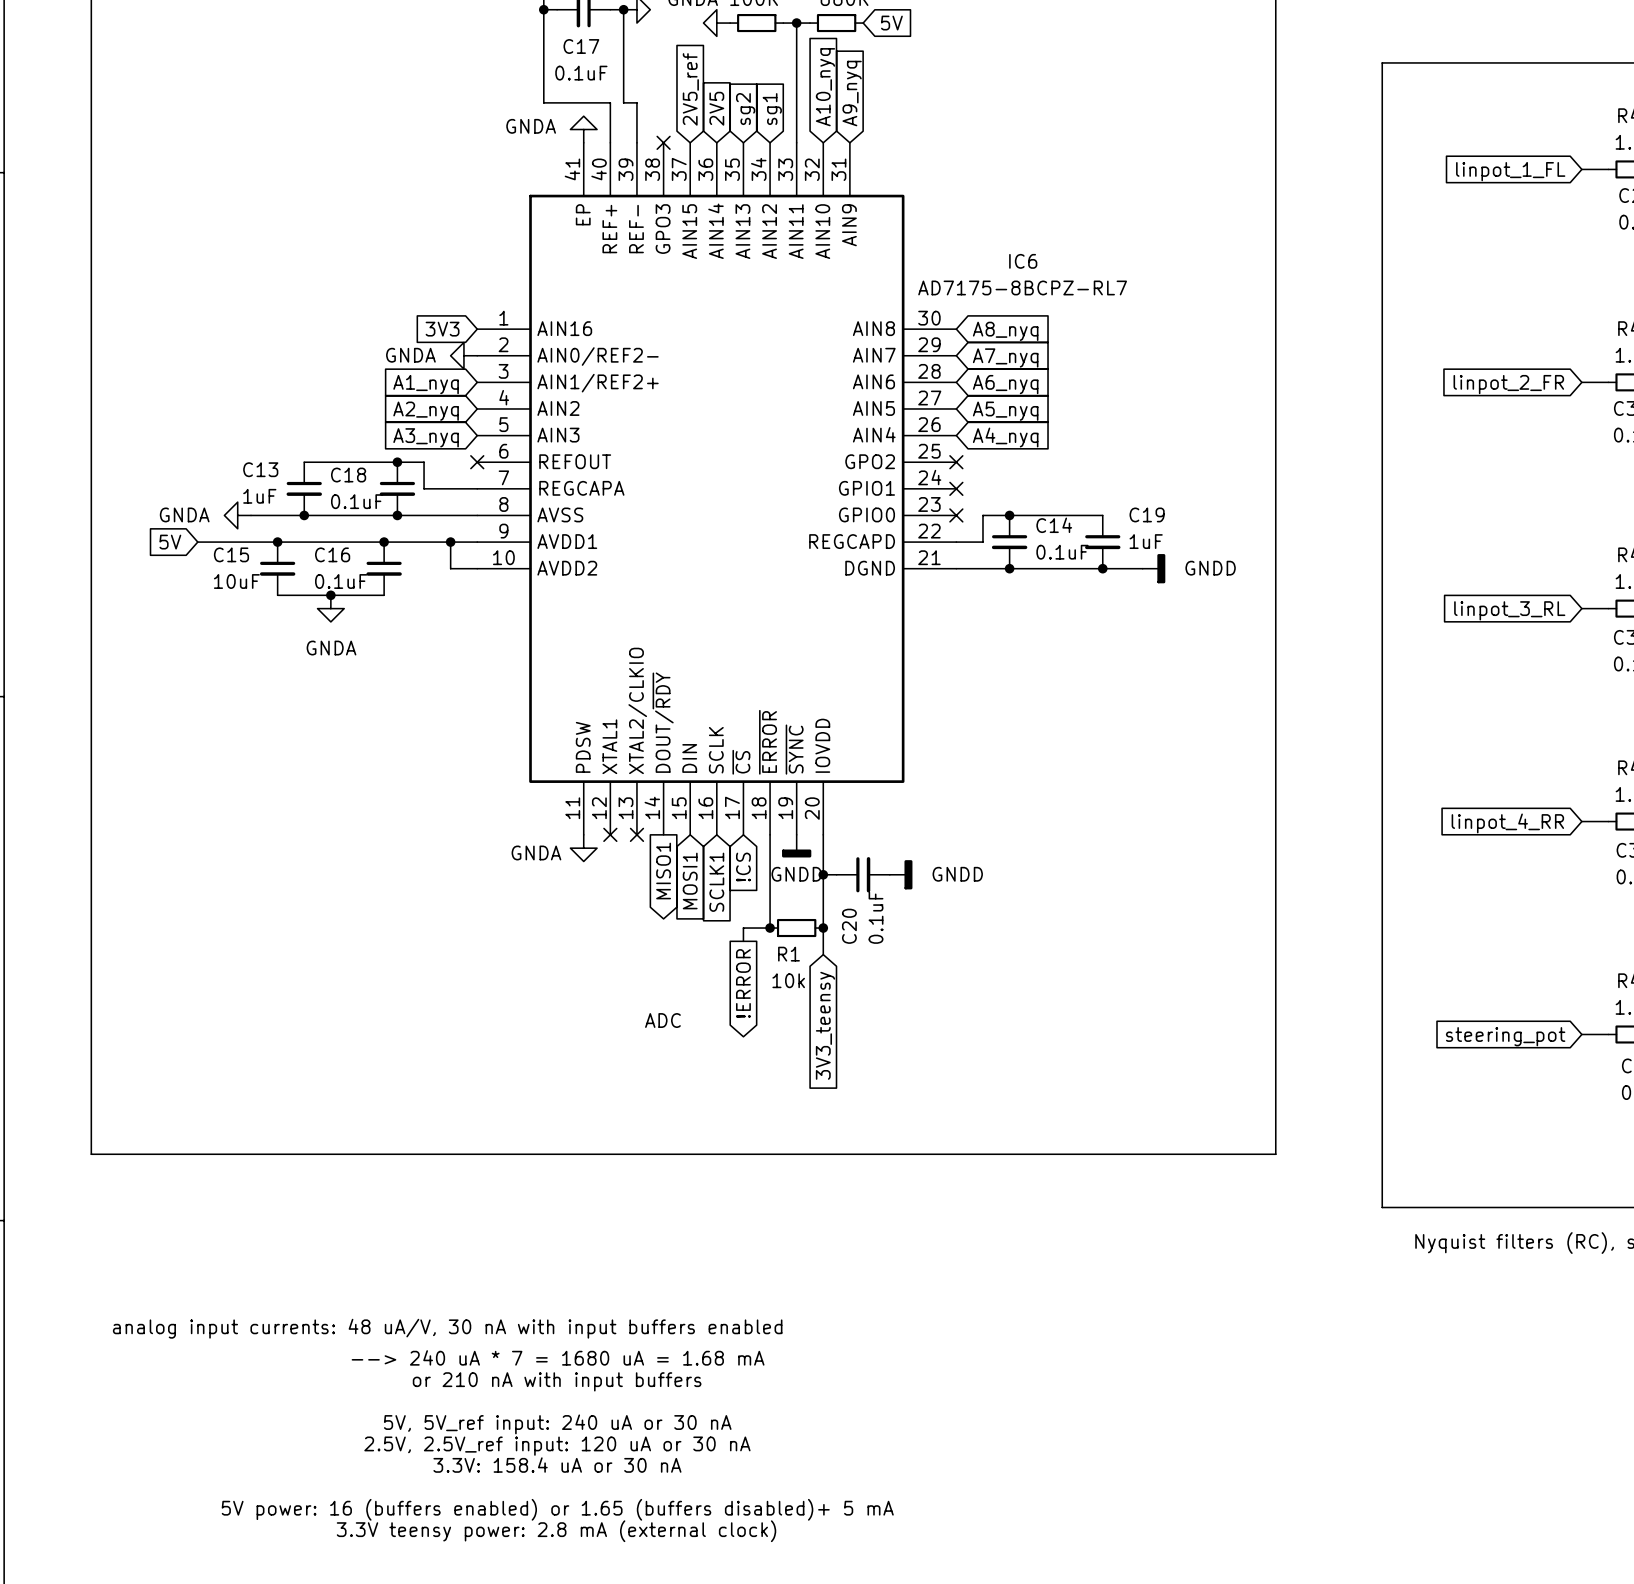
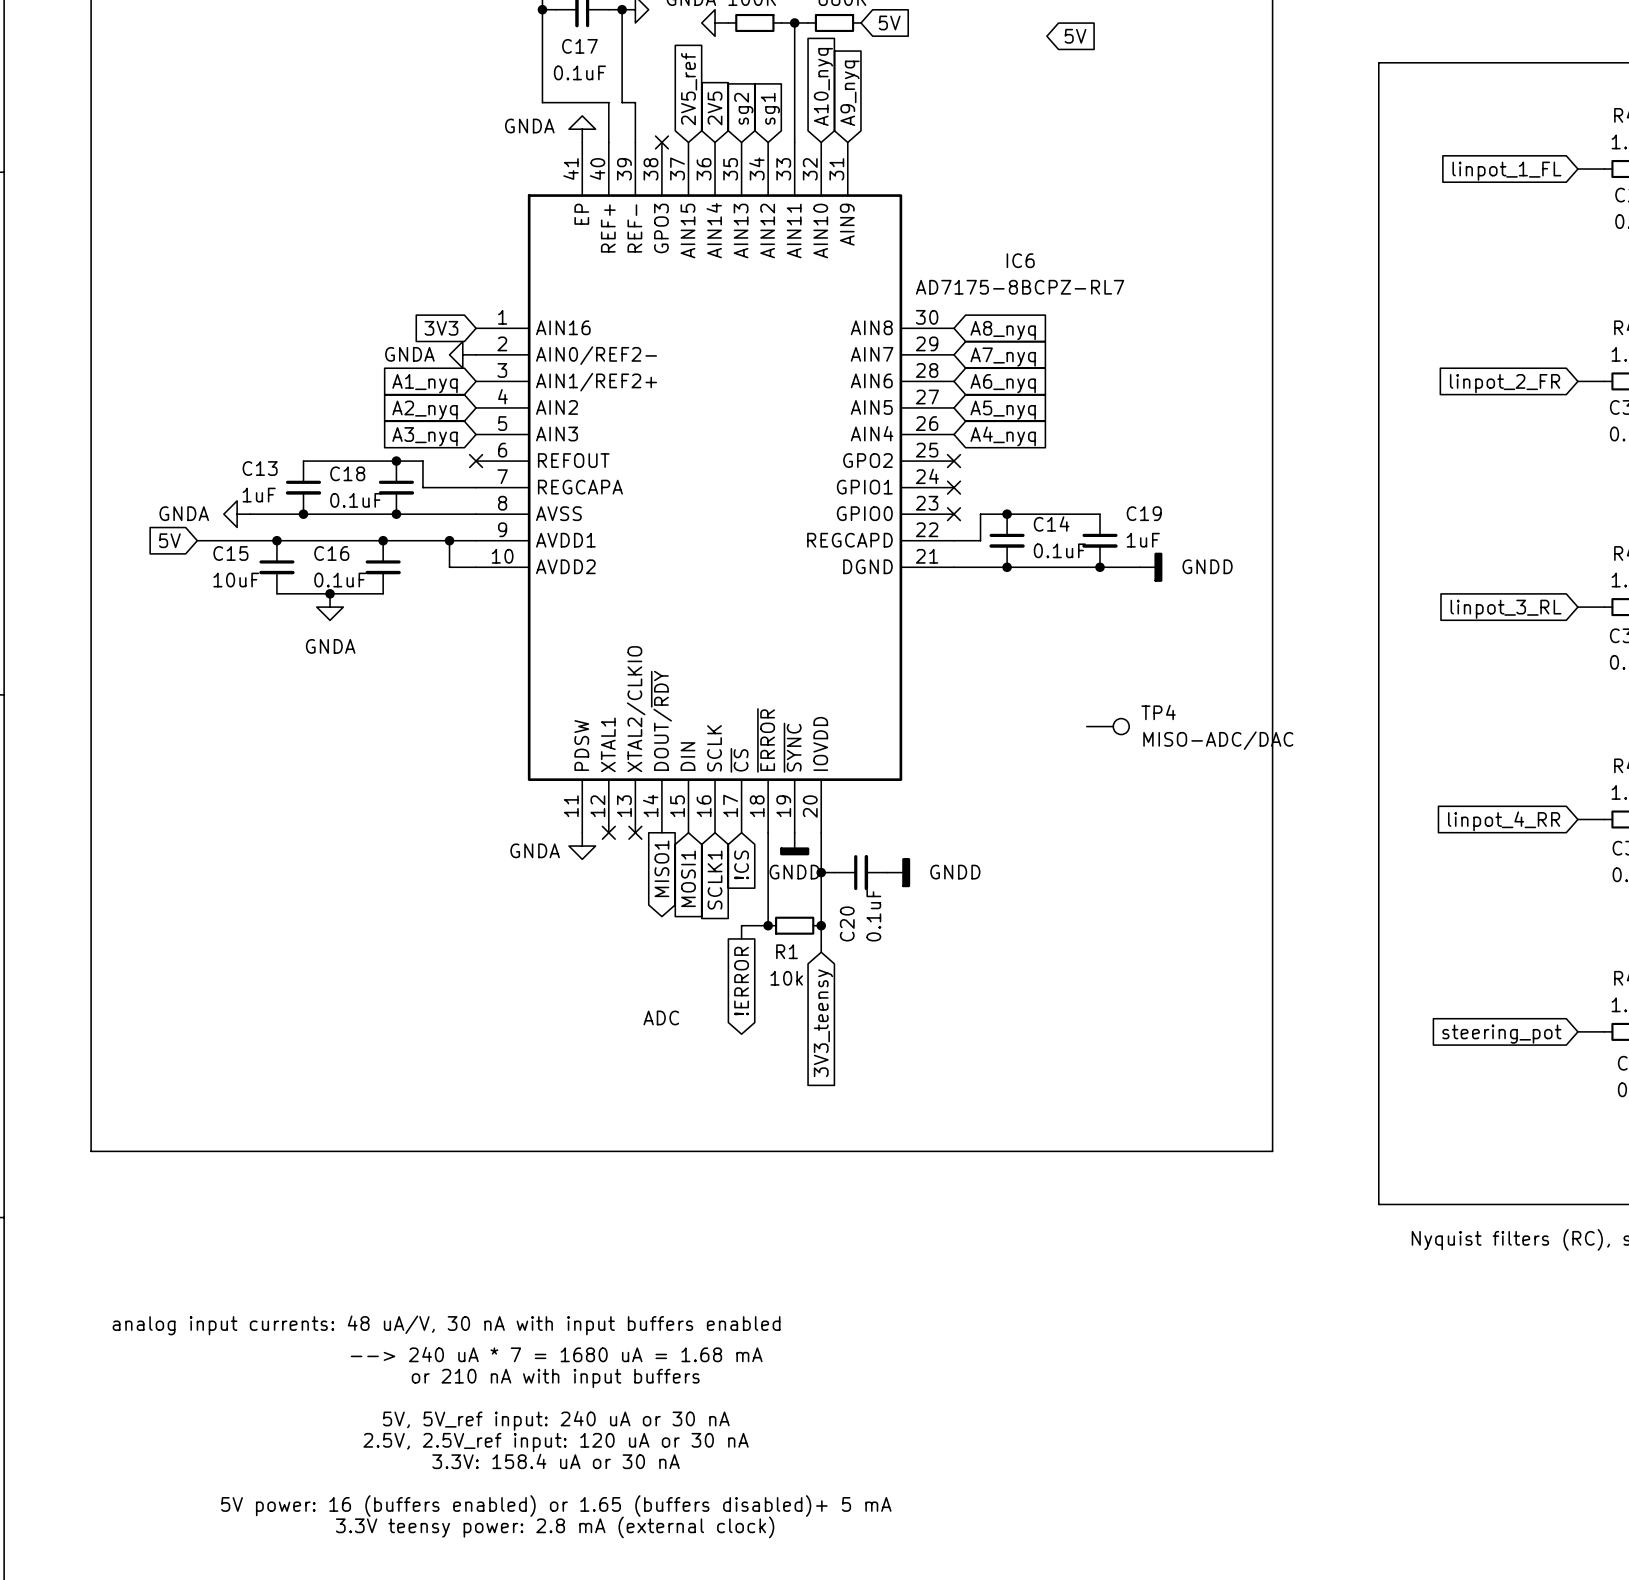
global label: none -> 5V (1075, 36)
TP4: none -> MISO-ADC/DAC (1107, 726)

